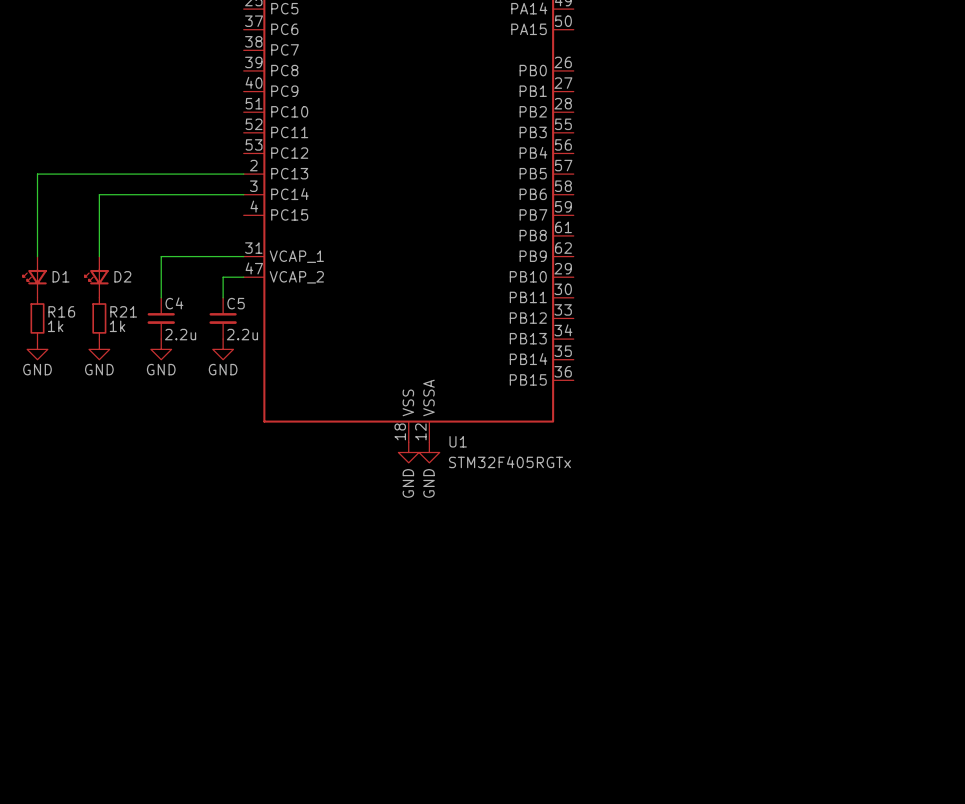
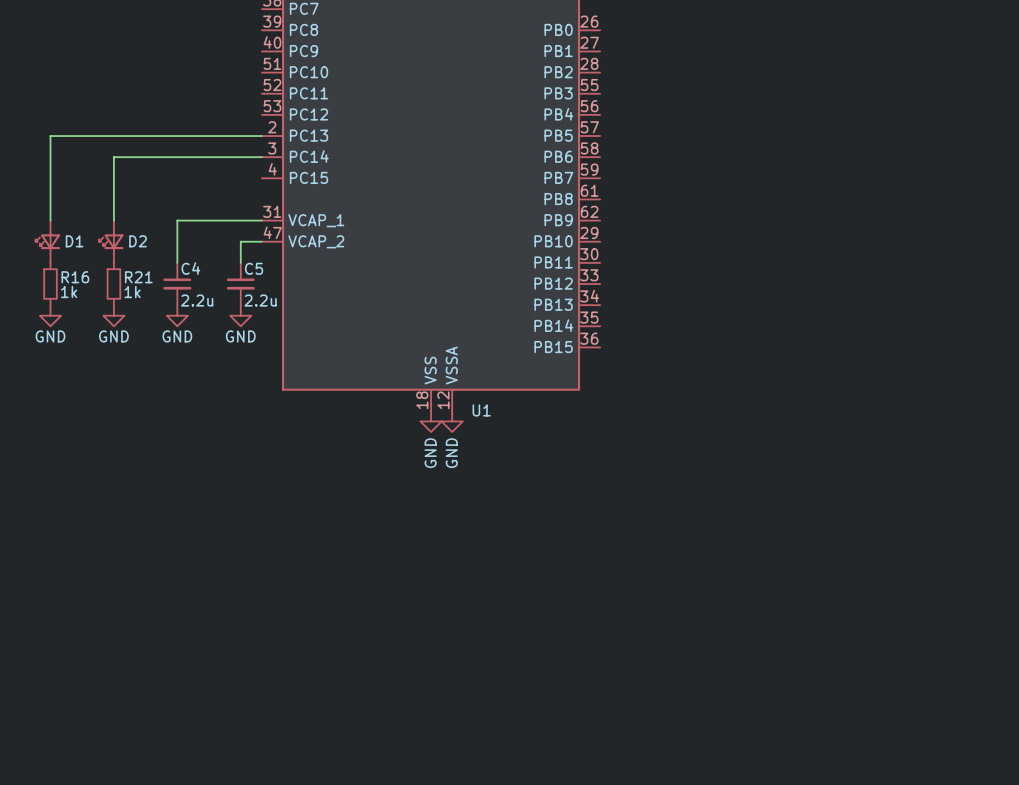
U1 value: STM32F405RGTx (509, 462) -> none

